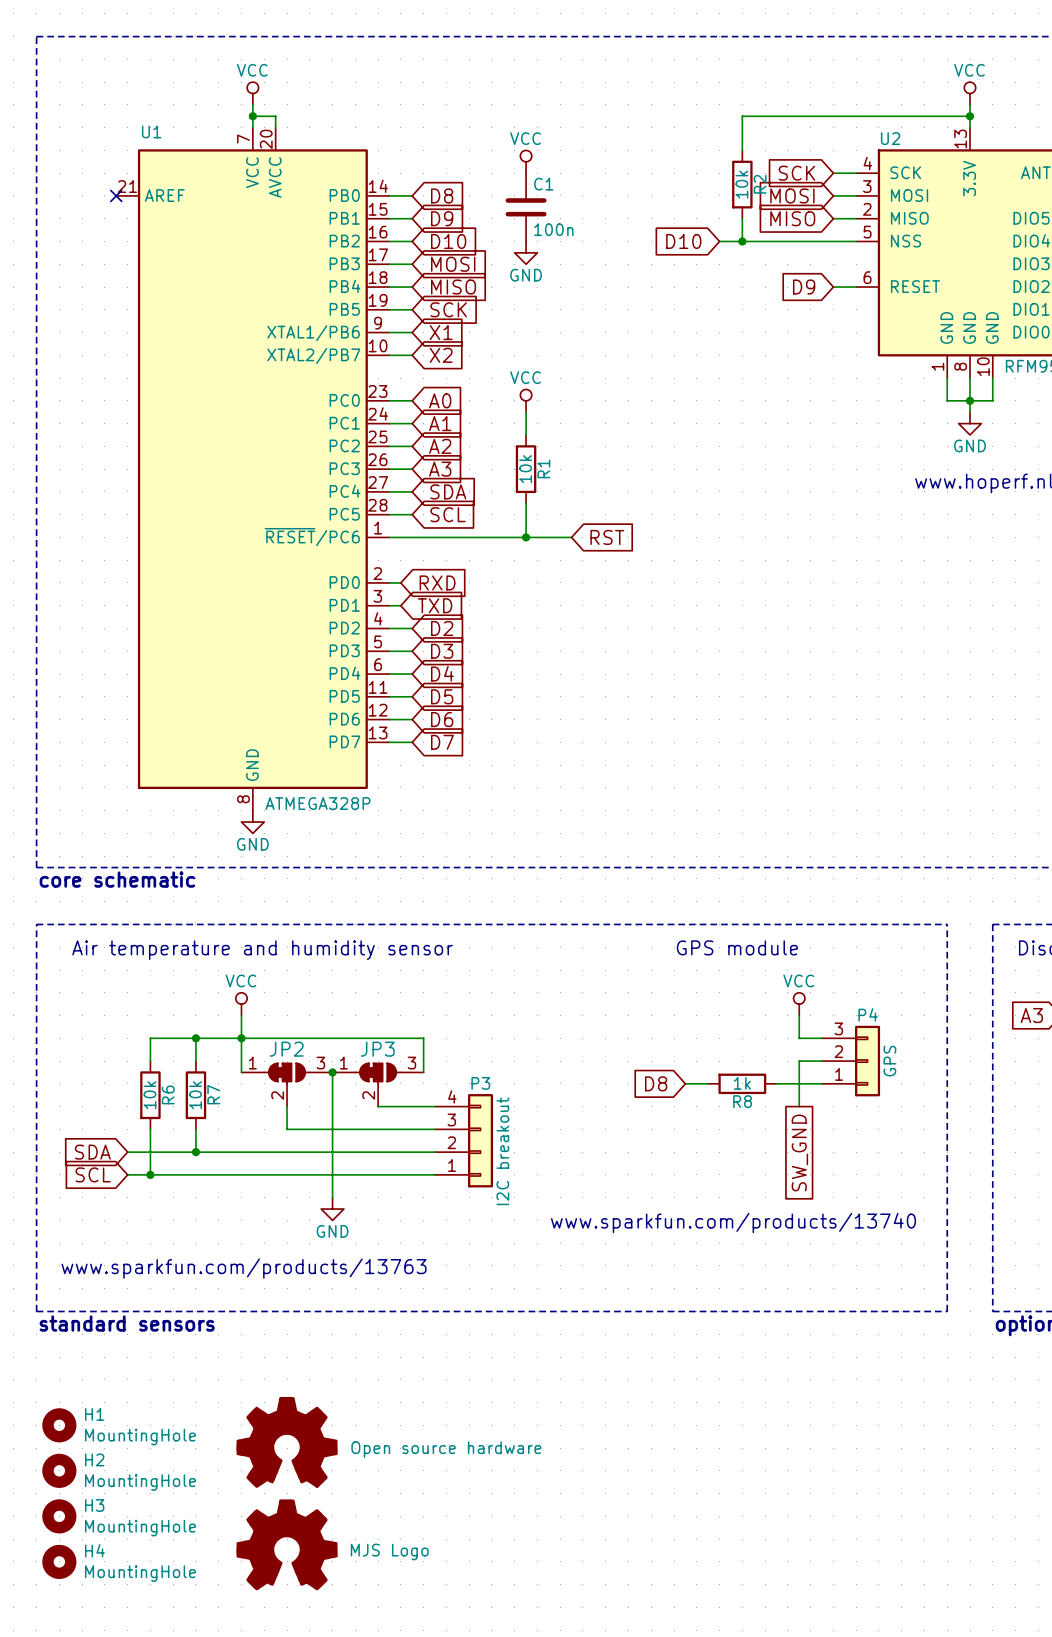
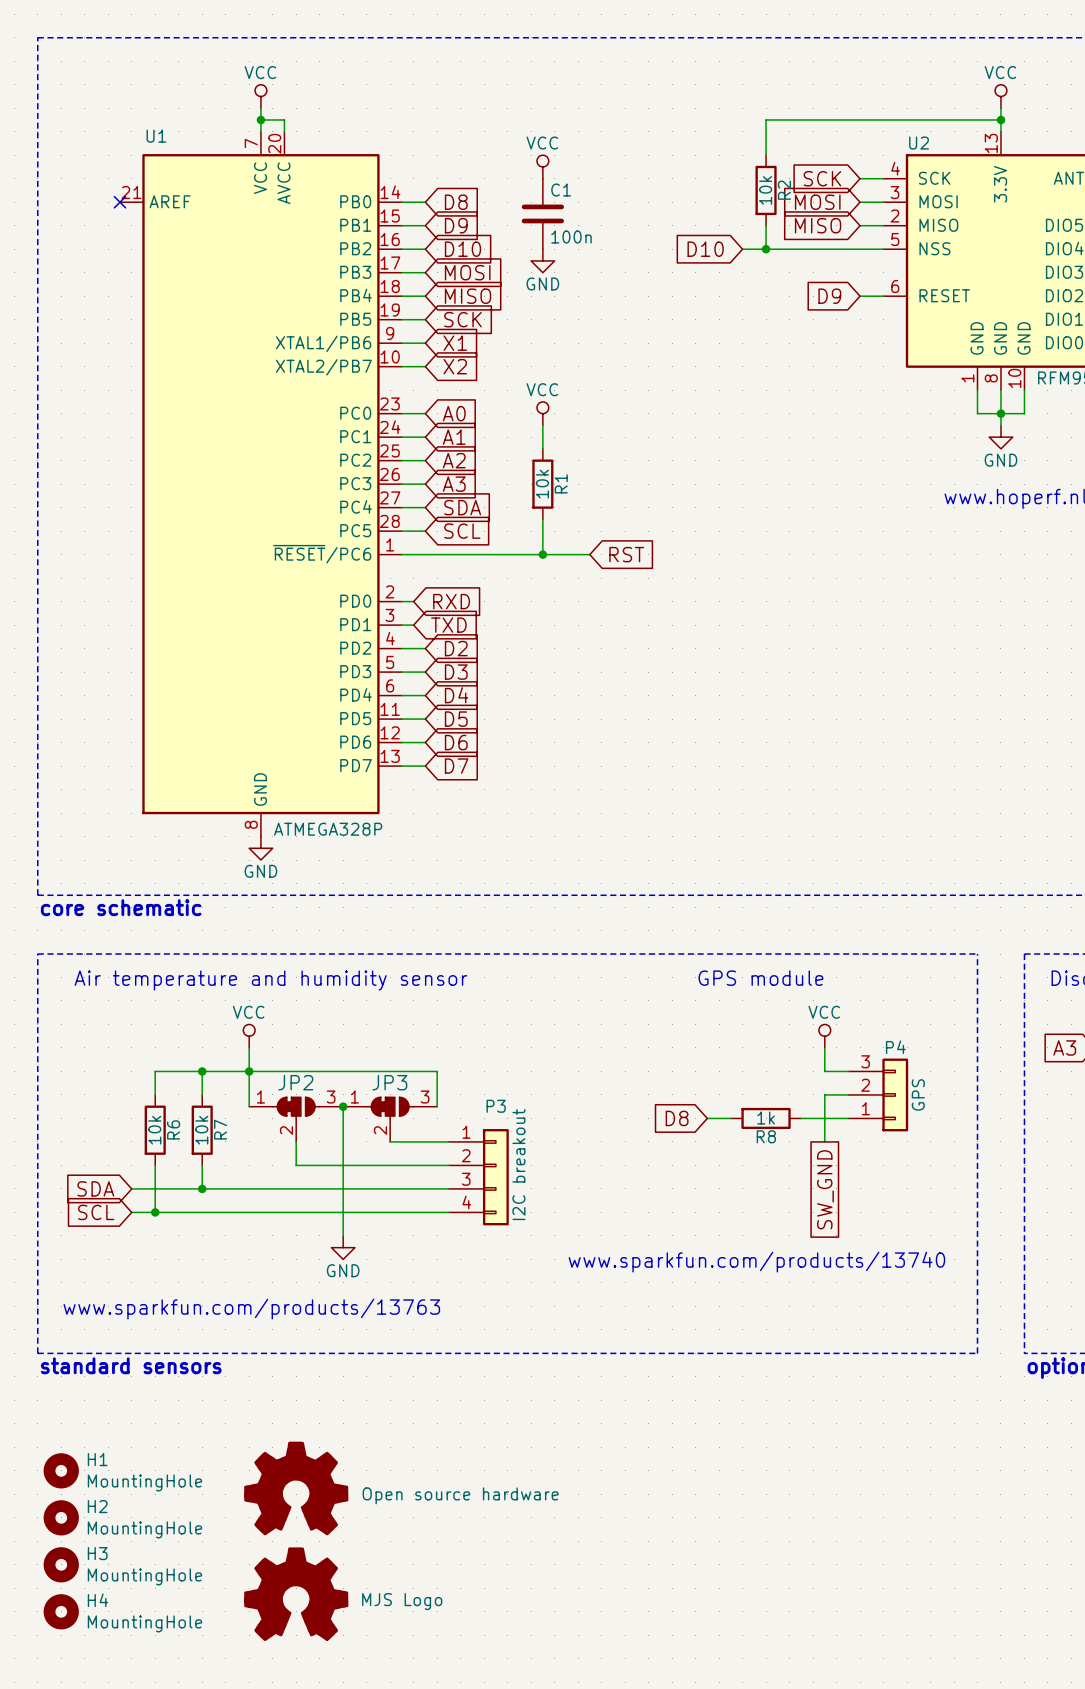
P3 flip: as is (480, 1140) -> up-down (495, 1177)

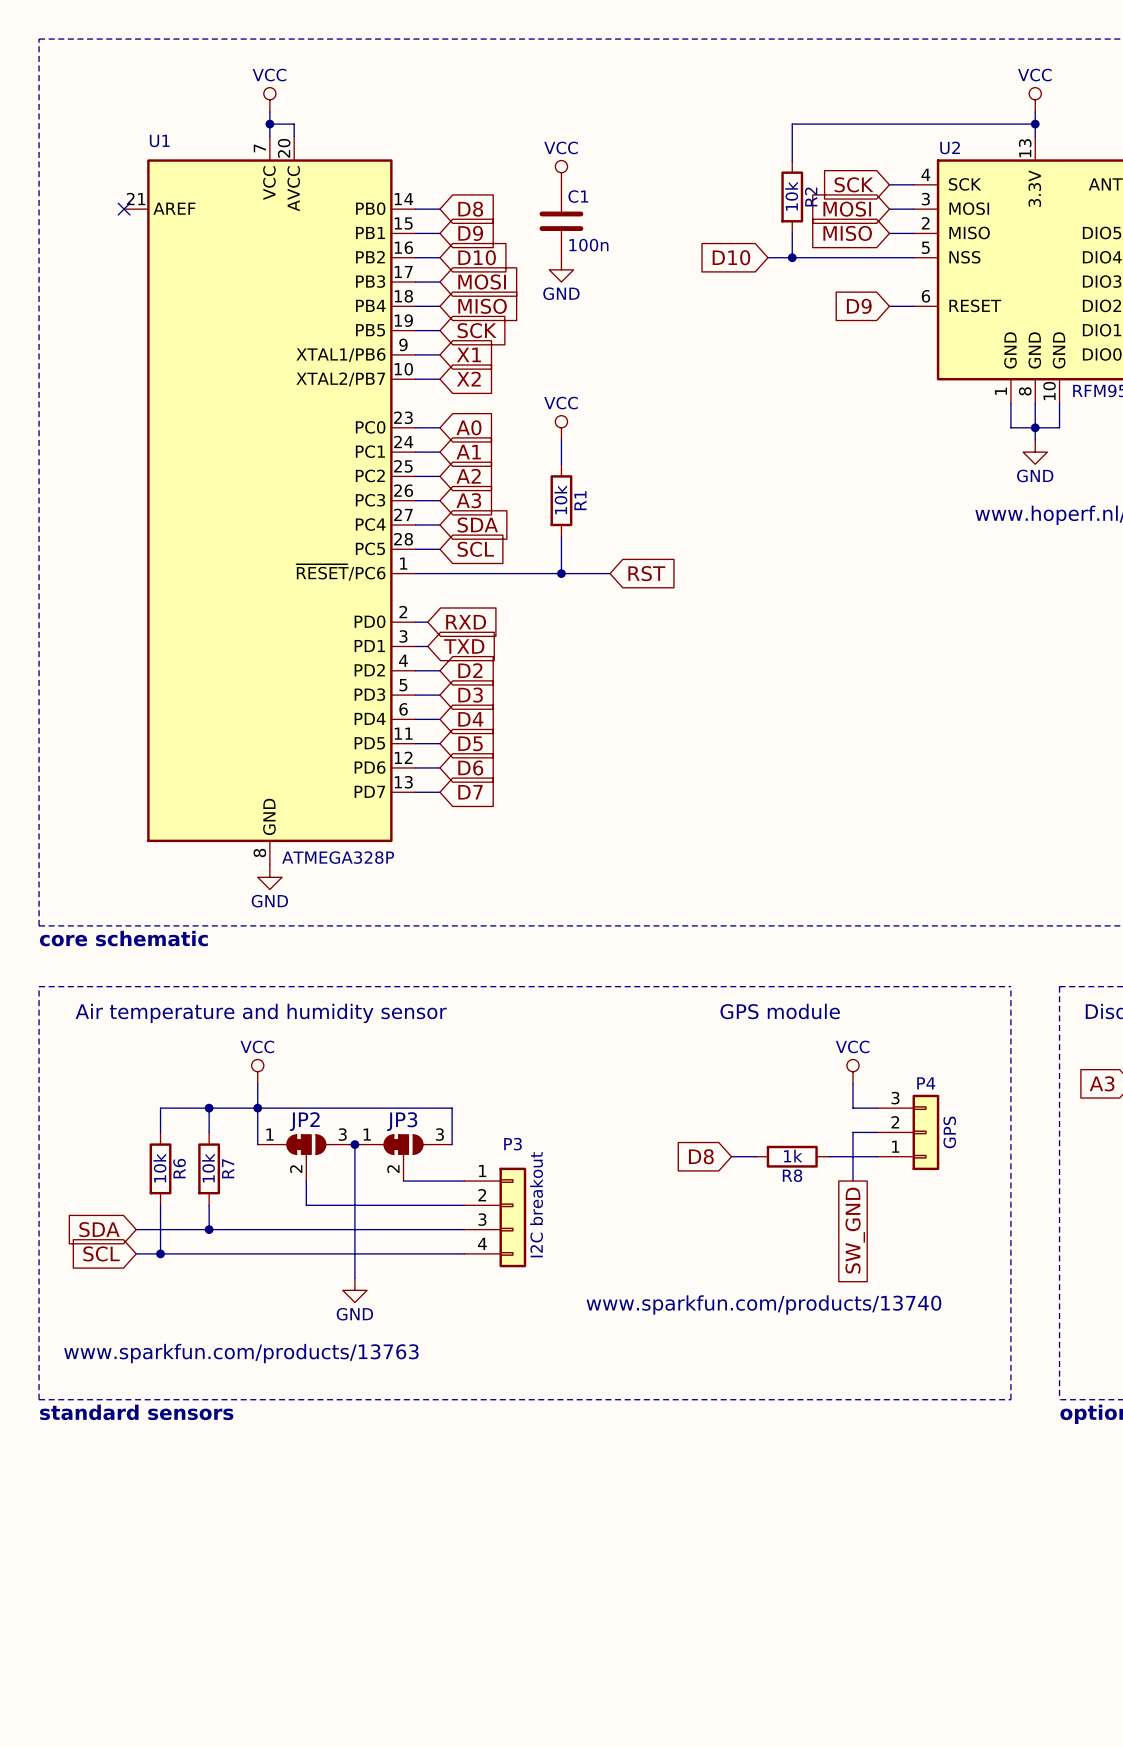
H1: MountingHole (61, 1470) -> none
part: Open source hardware (296, 1488) -> none
H2: MountingHole (61, 1517) -> none
H3: MountingHole (61, 1564) -> none
part: MJS Logo (296, 1594) -> none
H4: MountingHole (61, 1611) -> none

